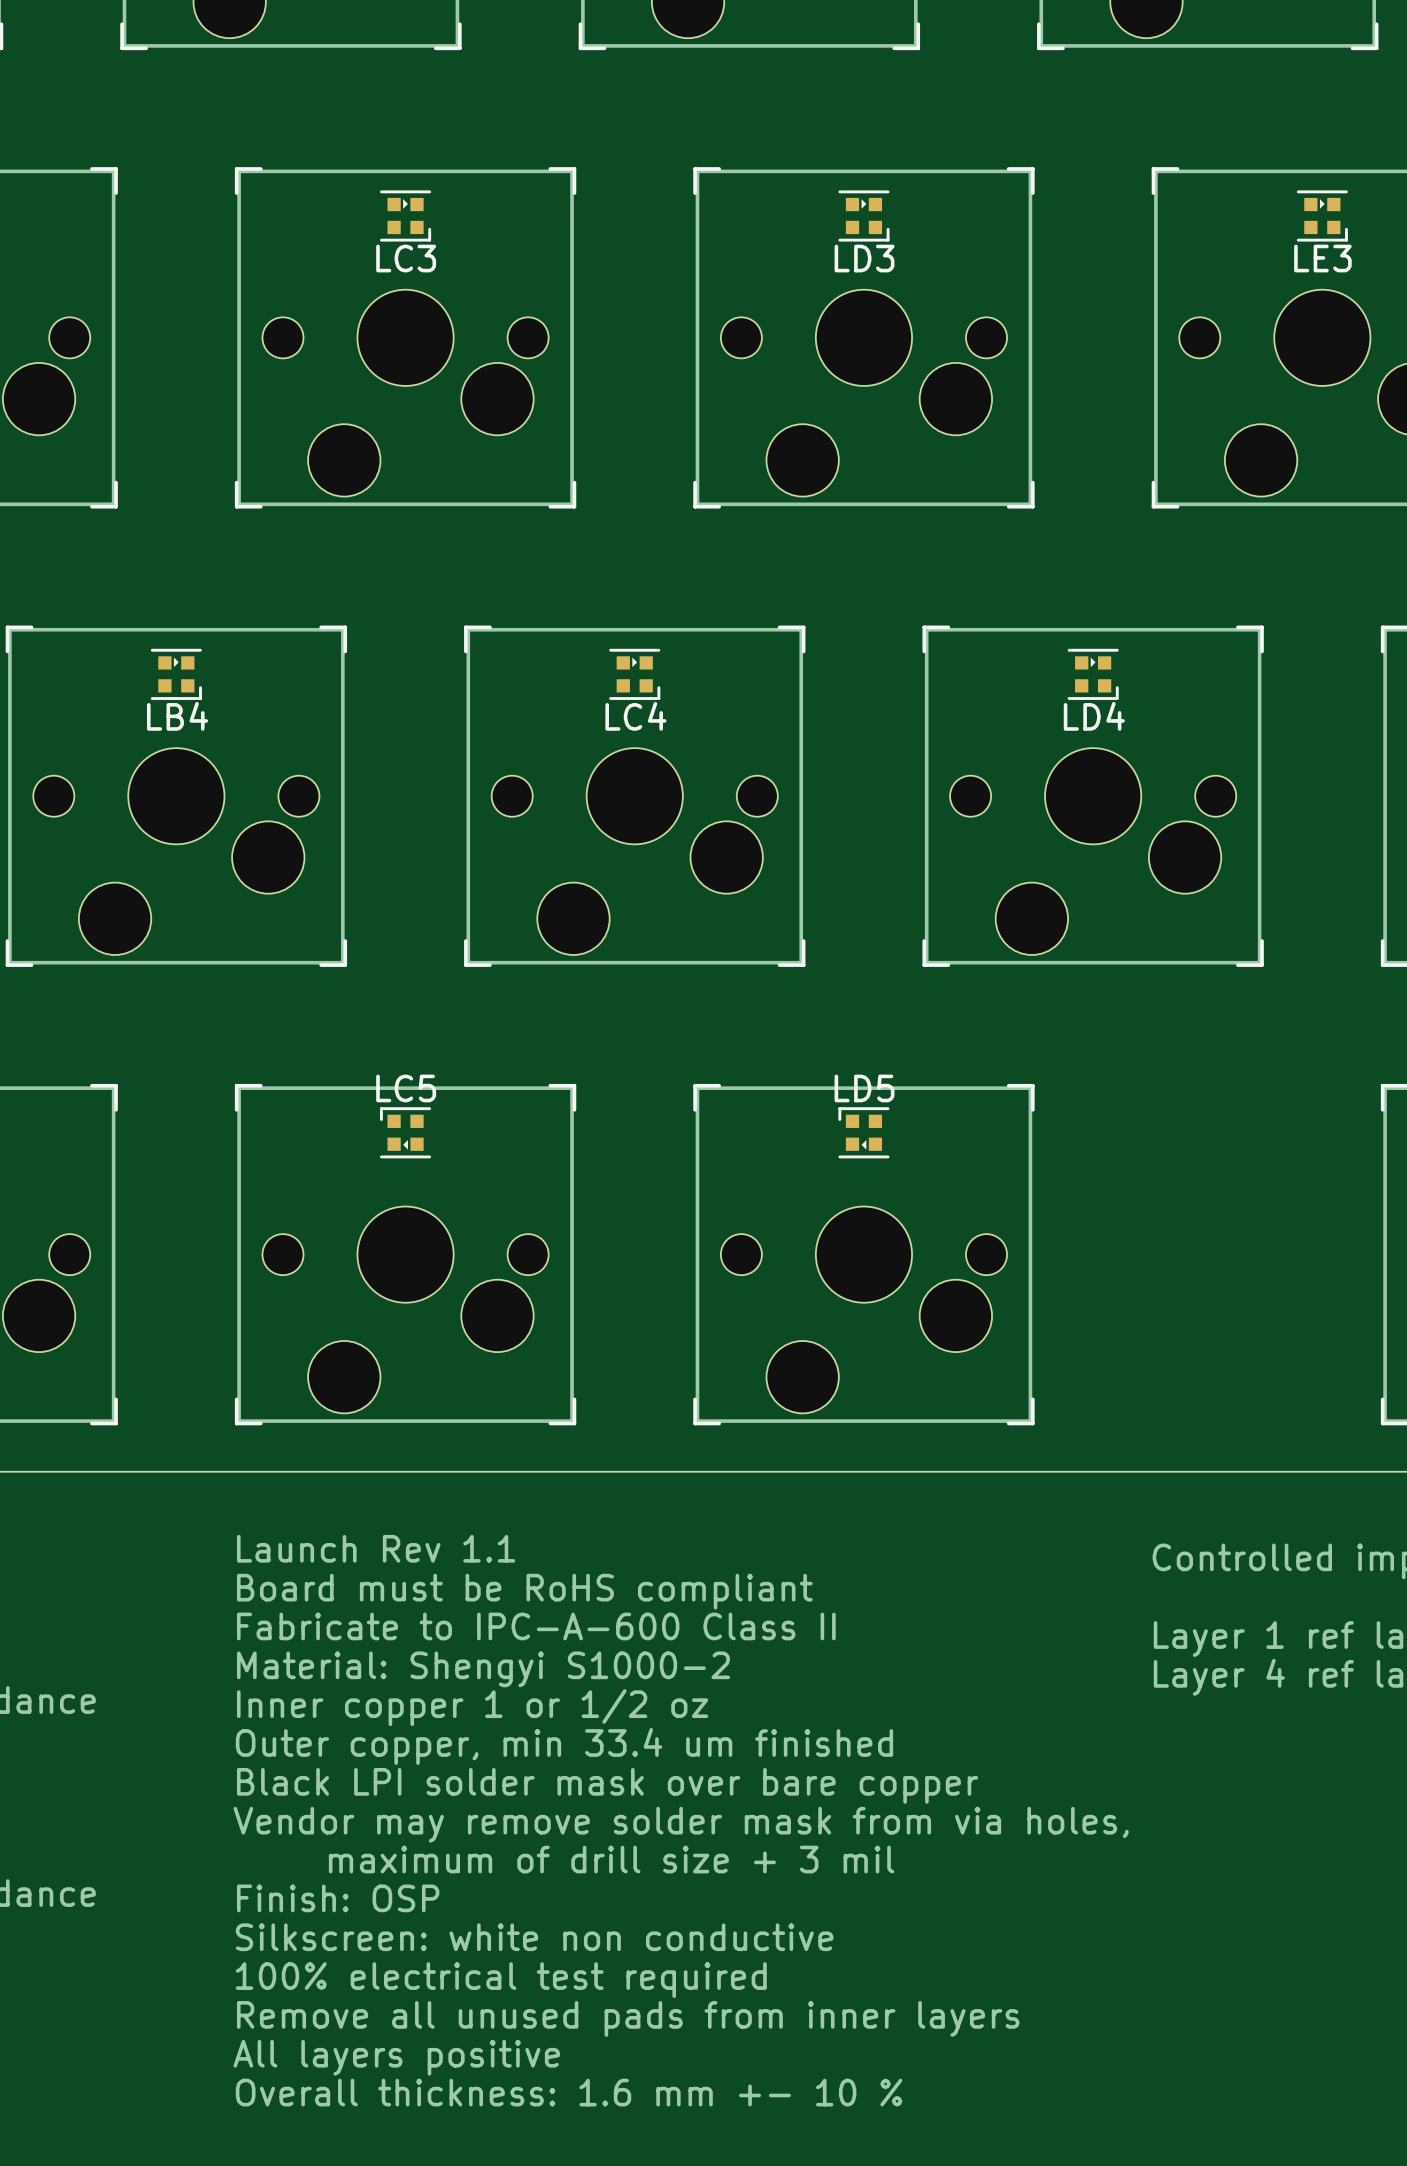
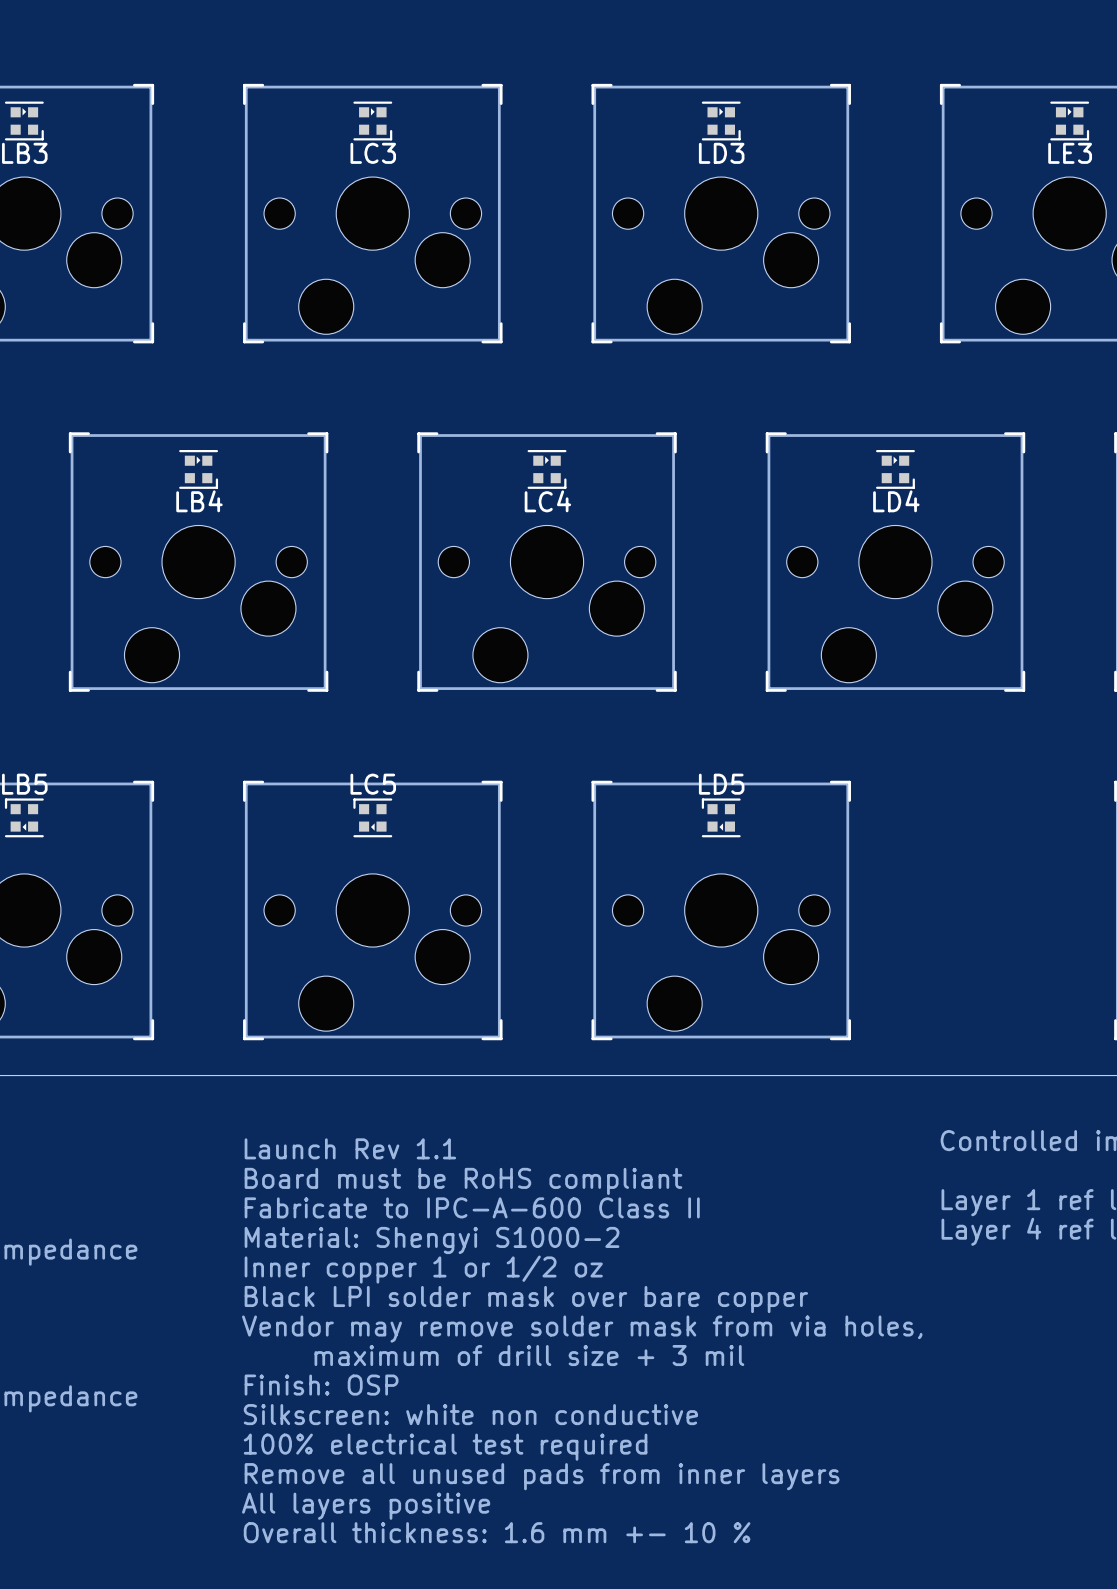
text position: Launch Rev 1.1 (376, 1548) -> Launch Rev 1.1 (350, 1148)
text position: Board must be RoHS compliant (524, 1591) -> Board must be RoHS compliant (463, 1181)
text position: Fabricate to IPC-A-600 Class II (536, 1626) -> Fabricate to IPC-A-600 Class II (472, 1207)
text position: Material: Shengyi S1000-2 (483, 1669) -> Material: Shengyi S1000-2 (432, 1240)
text position: Inner copper 1 or 1/2 oz (472, 1707) -> Inner copper 1 or 1/2 oz (423, 1269)
text: Outer copper, min 33.4 um finished (564, 1746) -> none
text position: Black LPI solder mask over bare copper (607, 1785) -> Black LPI solder mask over bare copper (526, 1299)
text position: Vendor may remove solder mask from via holes, (681, 1824) -> Vendor may remove solder mask from via holes, (582, 1329)
text position: maximum of drill size + 3 mil (611, 1859) -> maximum of drill size + 3 mil (529, 1355)
text position: Finish: OSP (338, 1898) -> Finish: OSP (321, 1385)
text position: Silkscreen: white non conductive (534, 1937) -> Silkscreen: white non conductive (470, 1414)
text position: 100% electrical test required (501, 1980) -> 100% electrical test required (445, 1447)
text position: Remove all unused pads from inner layers (628, 2018) -> Remove all unused pads from inner layers (542, 1476)
text position: All layers positive (396, 2057) -> All layers positive (366, 1506)
text position: Overall thickness: 1.6 mm +- 10 % (569, 2092) -> Overall thickness: 1.6 mm +- 10 % (497, 1532)

